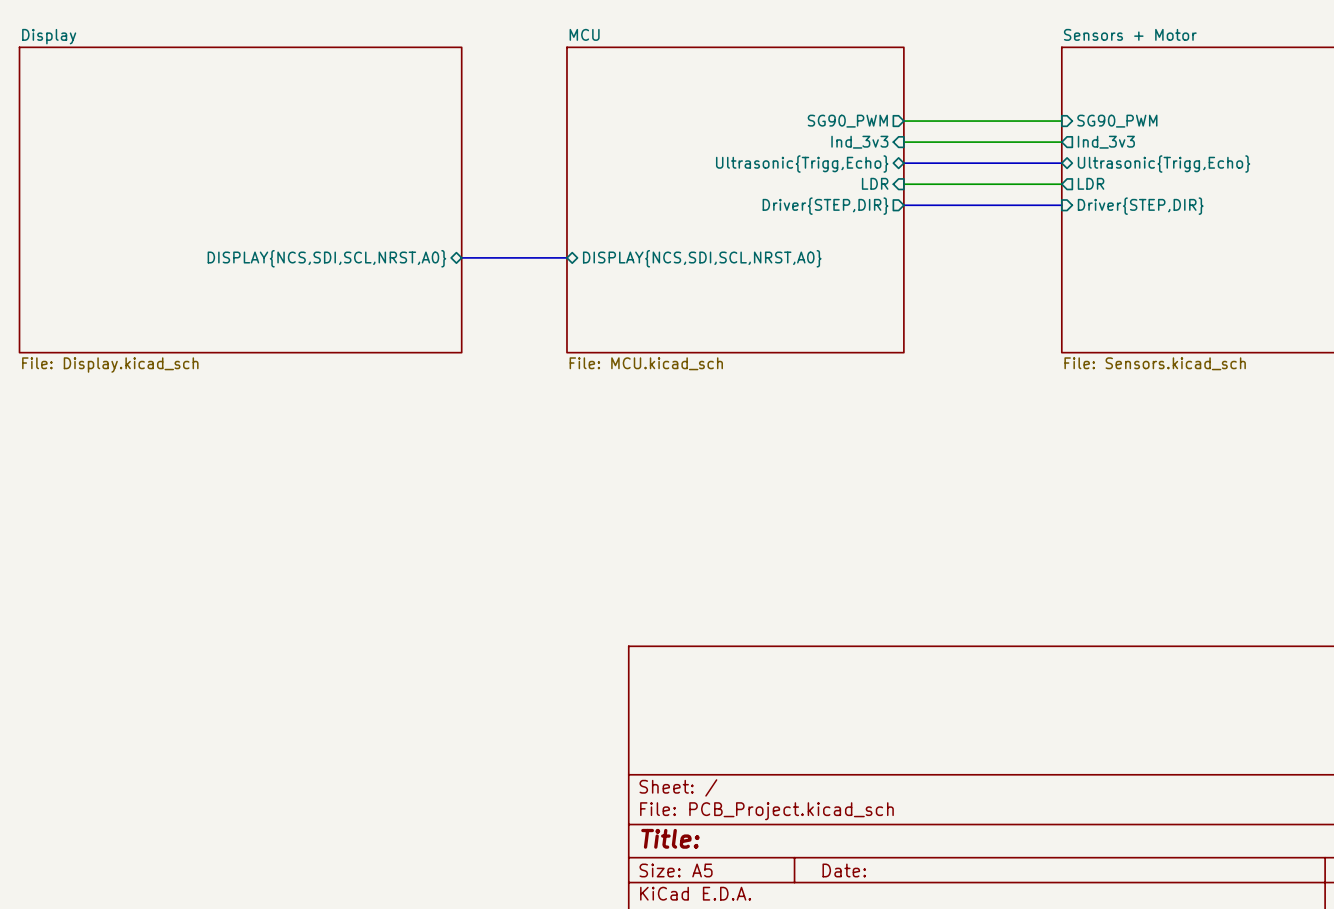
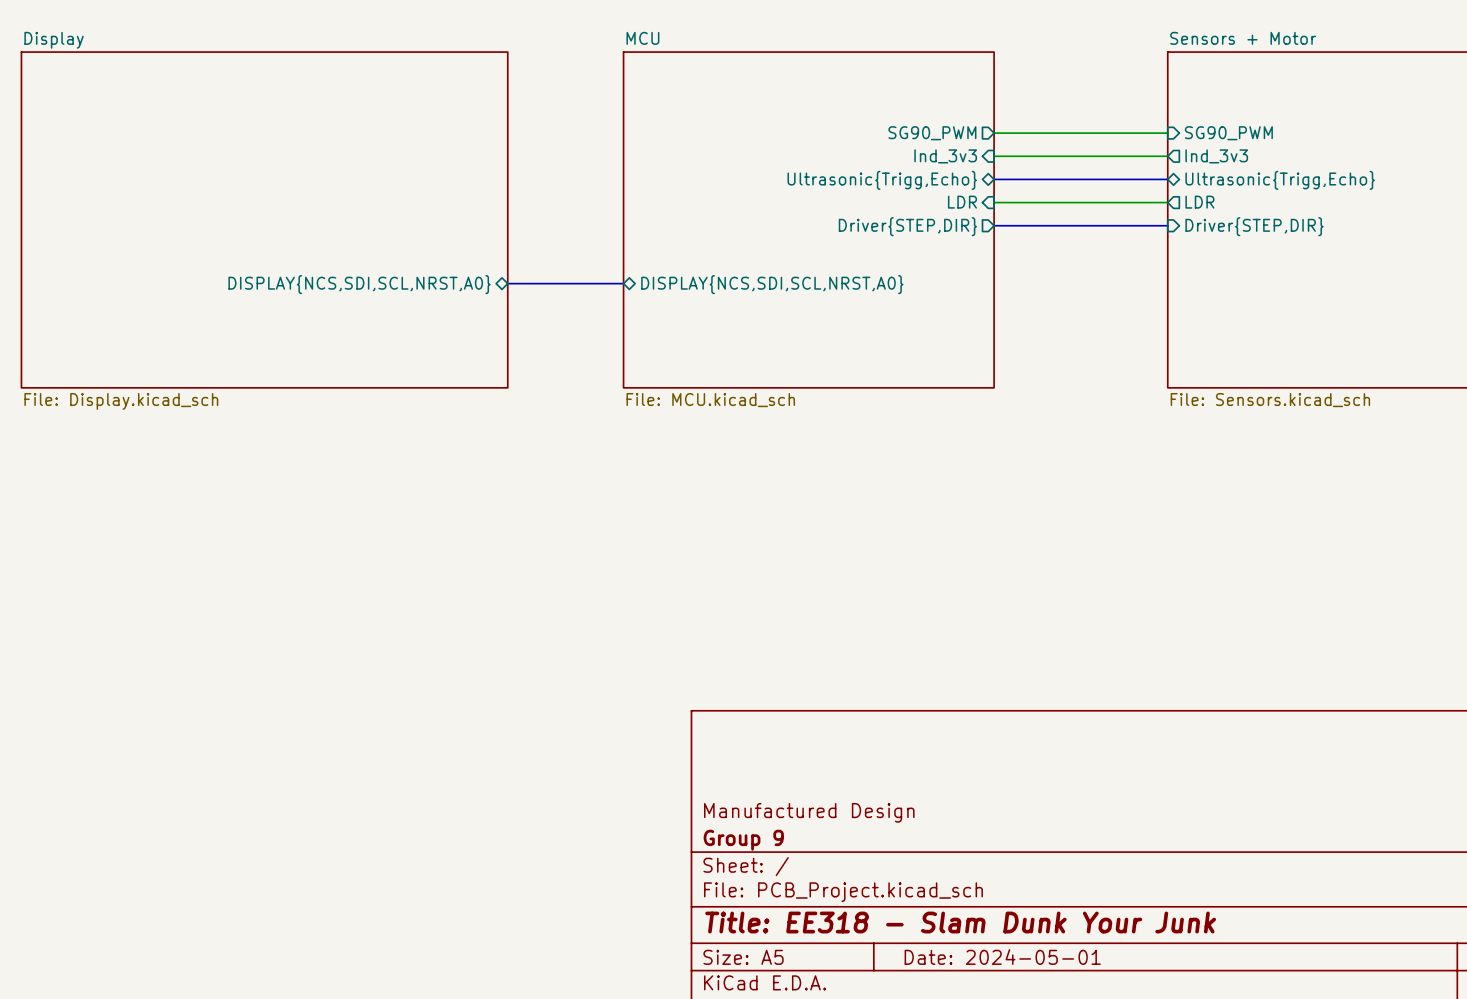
title block: none -> Manufactured Design (809, 812)
title block: none -> Group 9 (743, 840)
title block: Title: (670, 838) -> Title: EE318 - Slam Dunk Your Junk (960, 922)
title block: Date: (844, 870) -> Date: 2024-05-01 (1002, 957)

